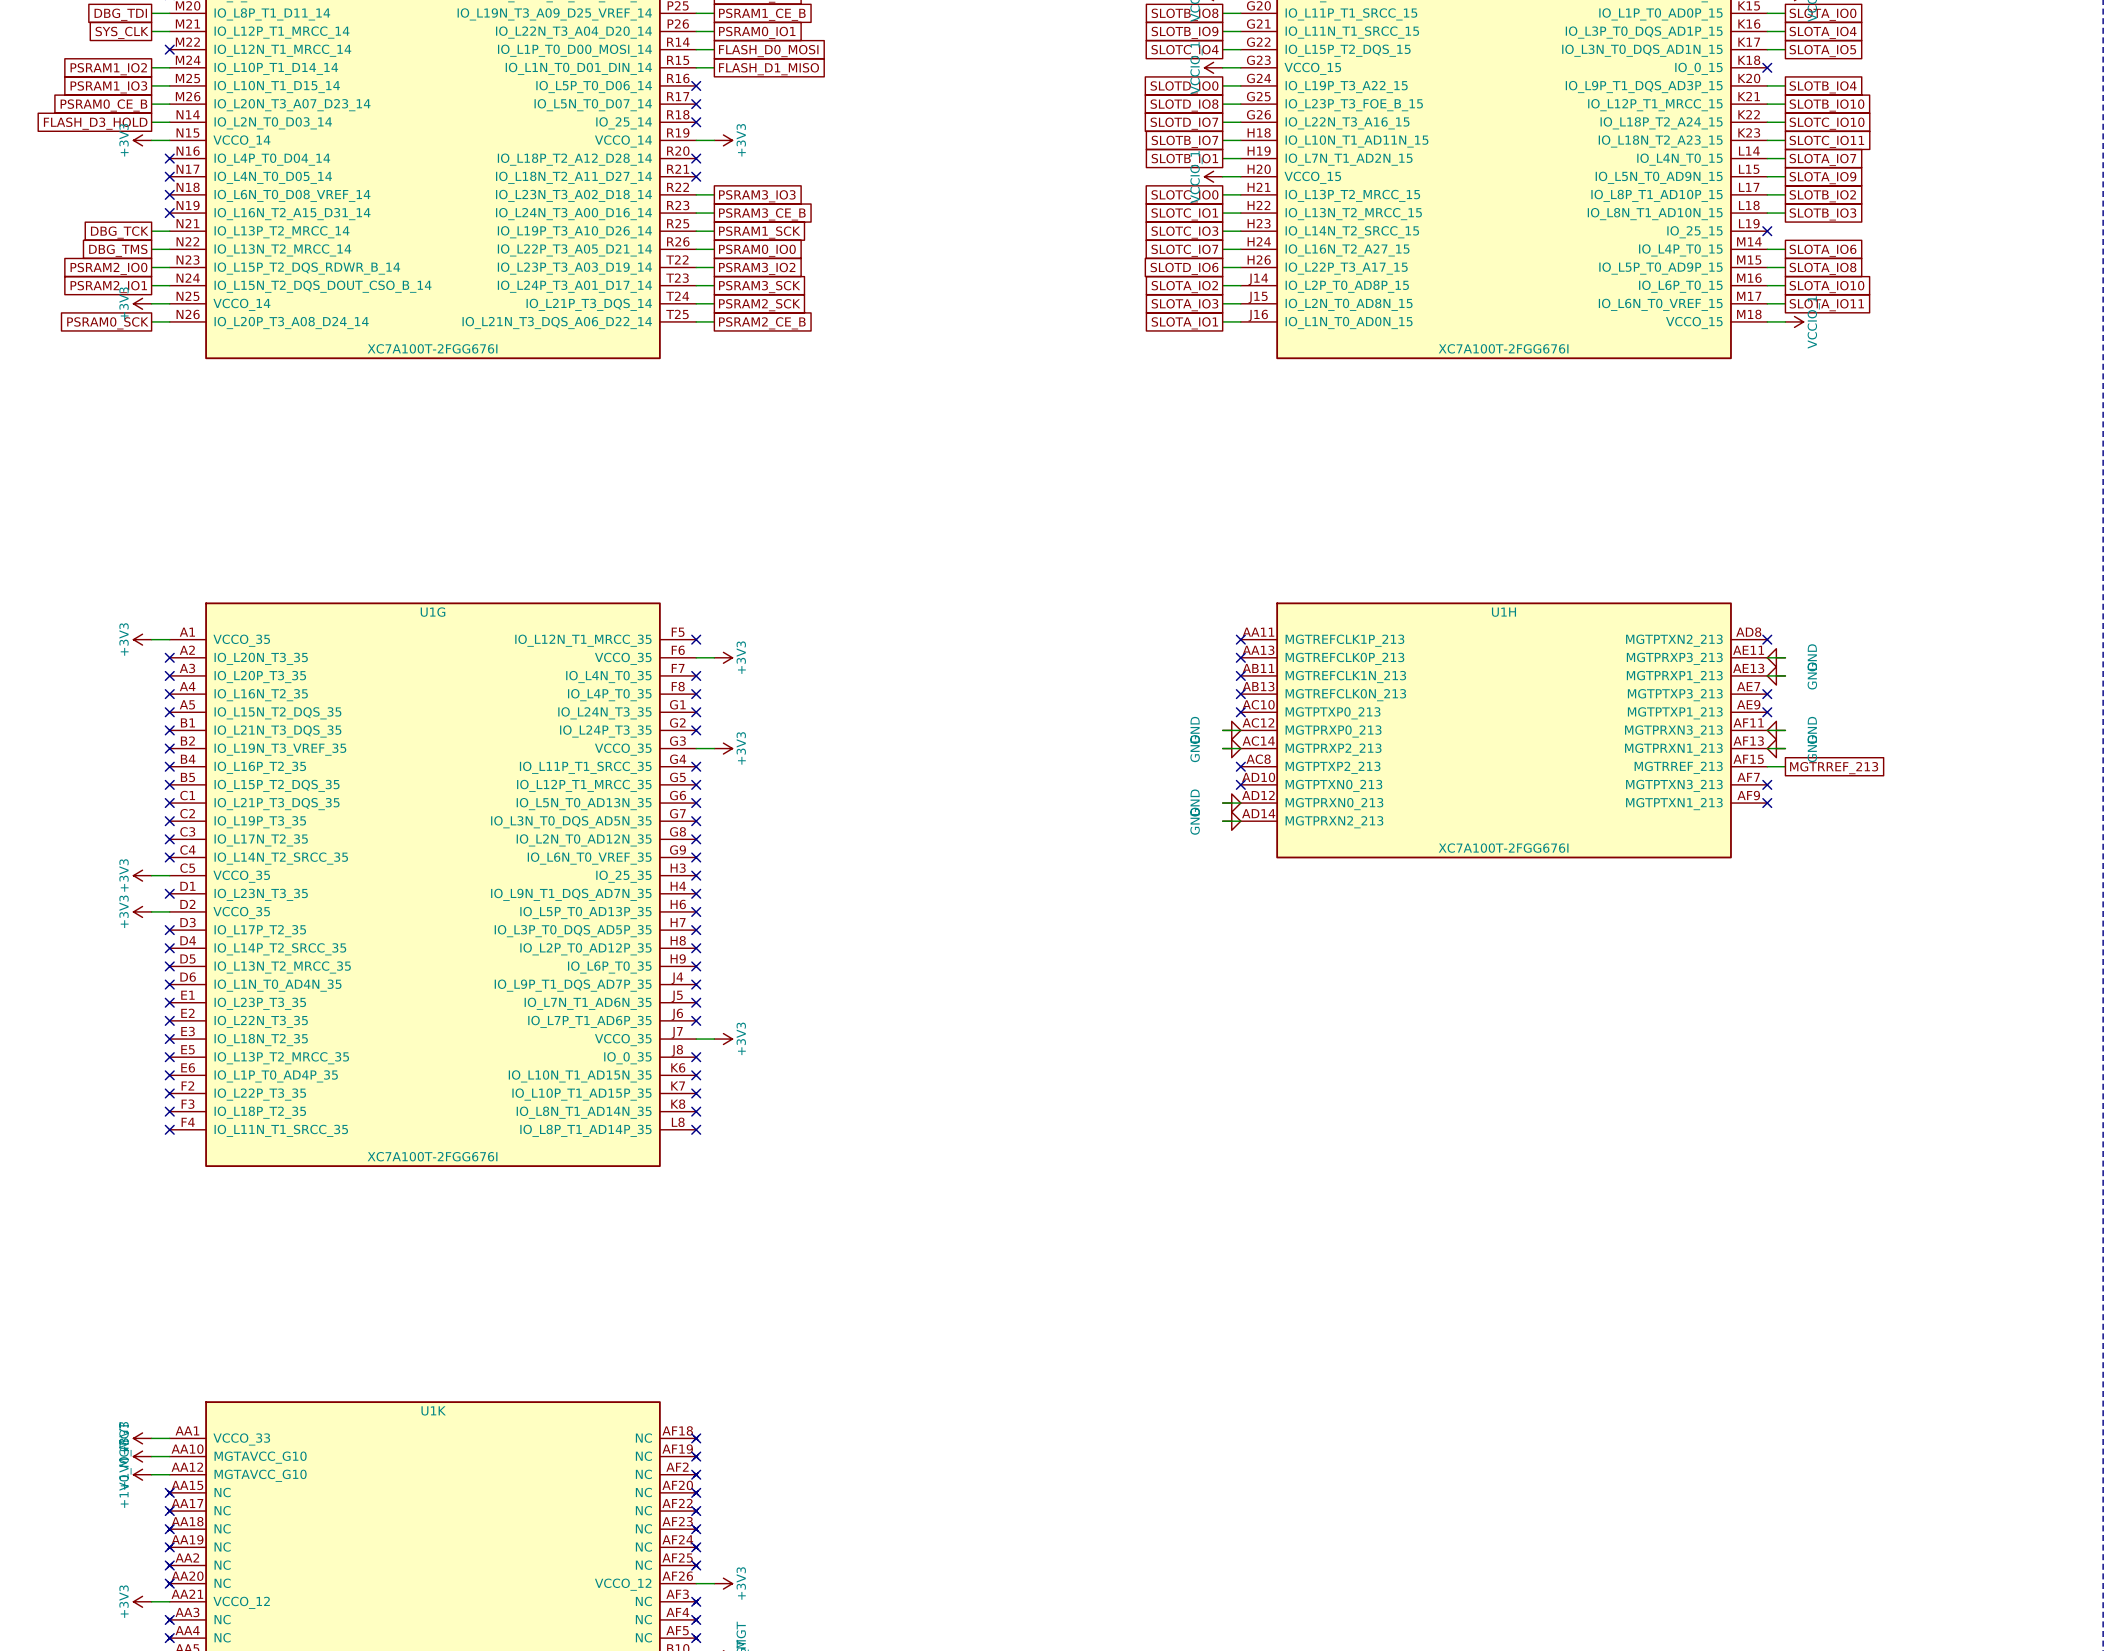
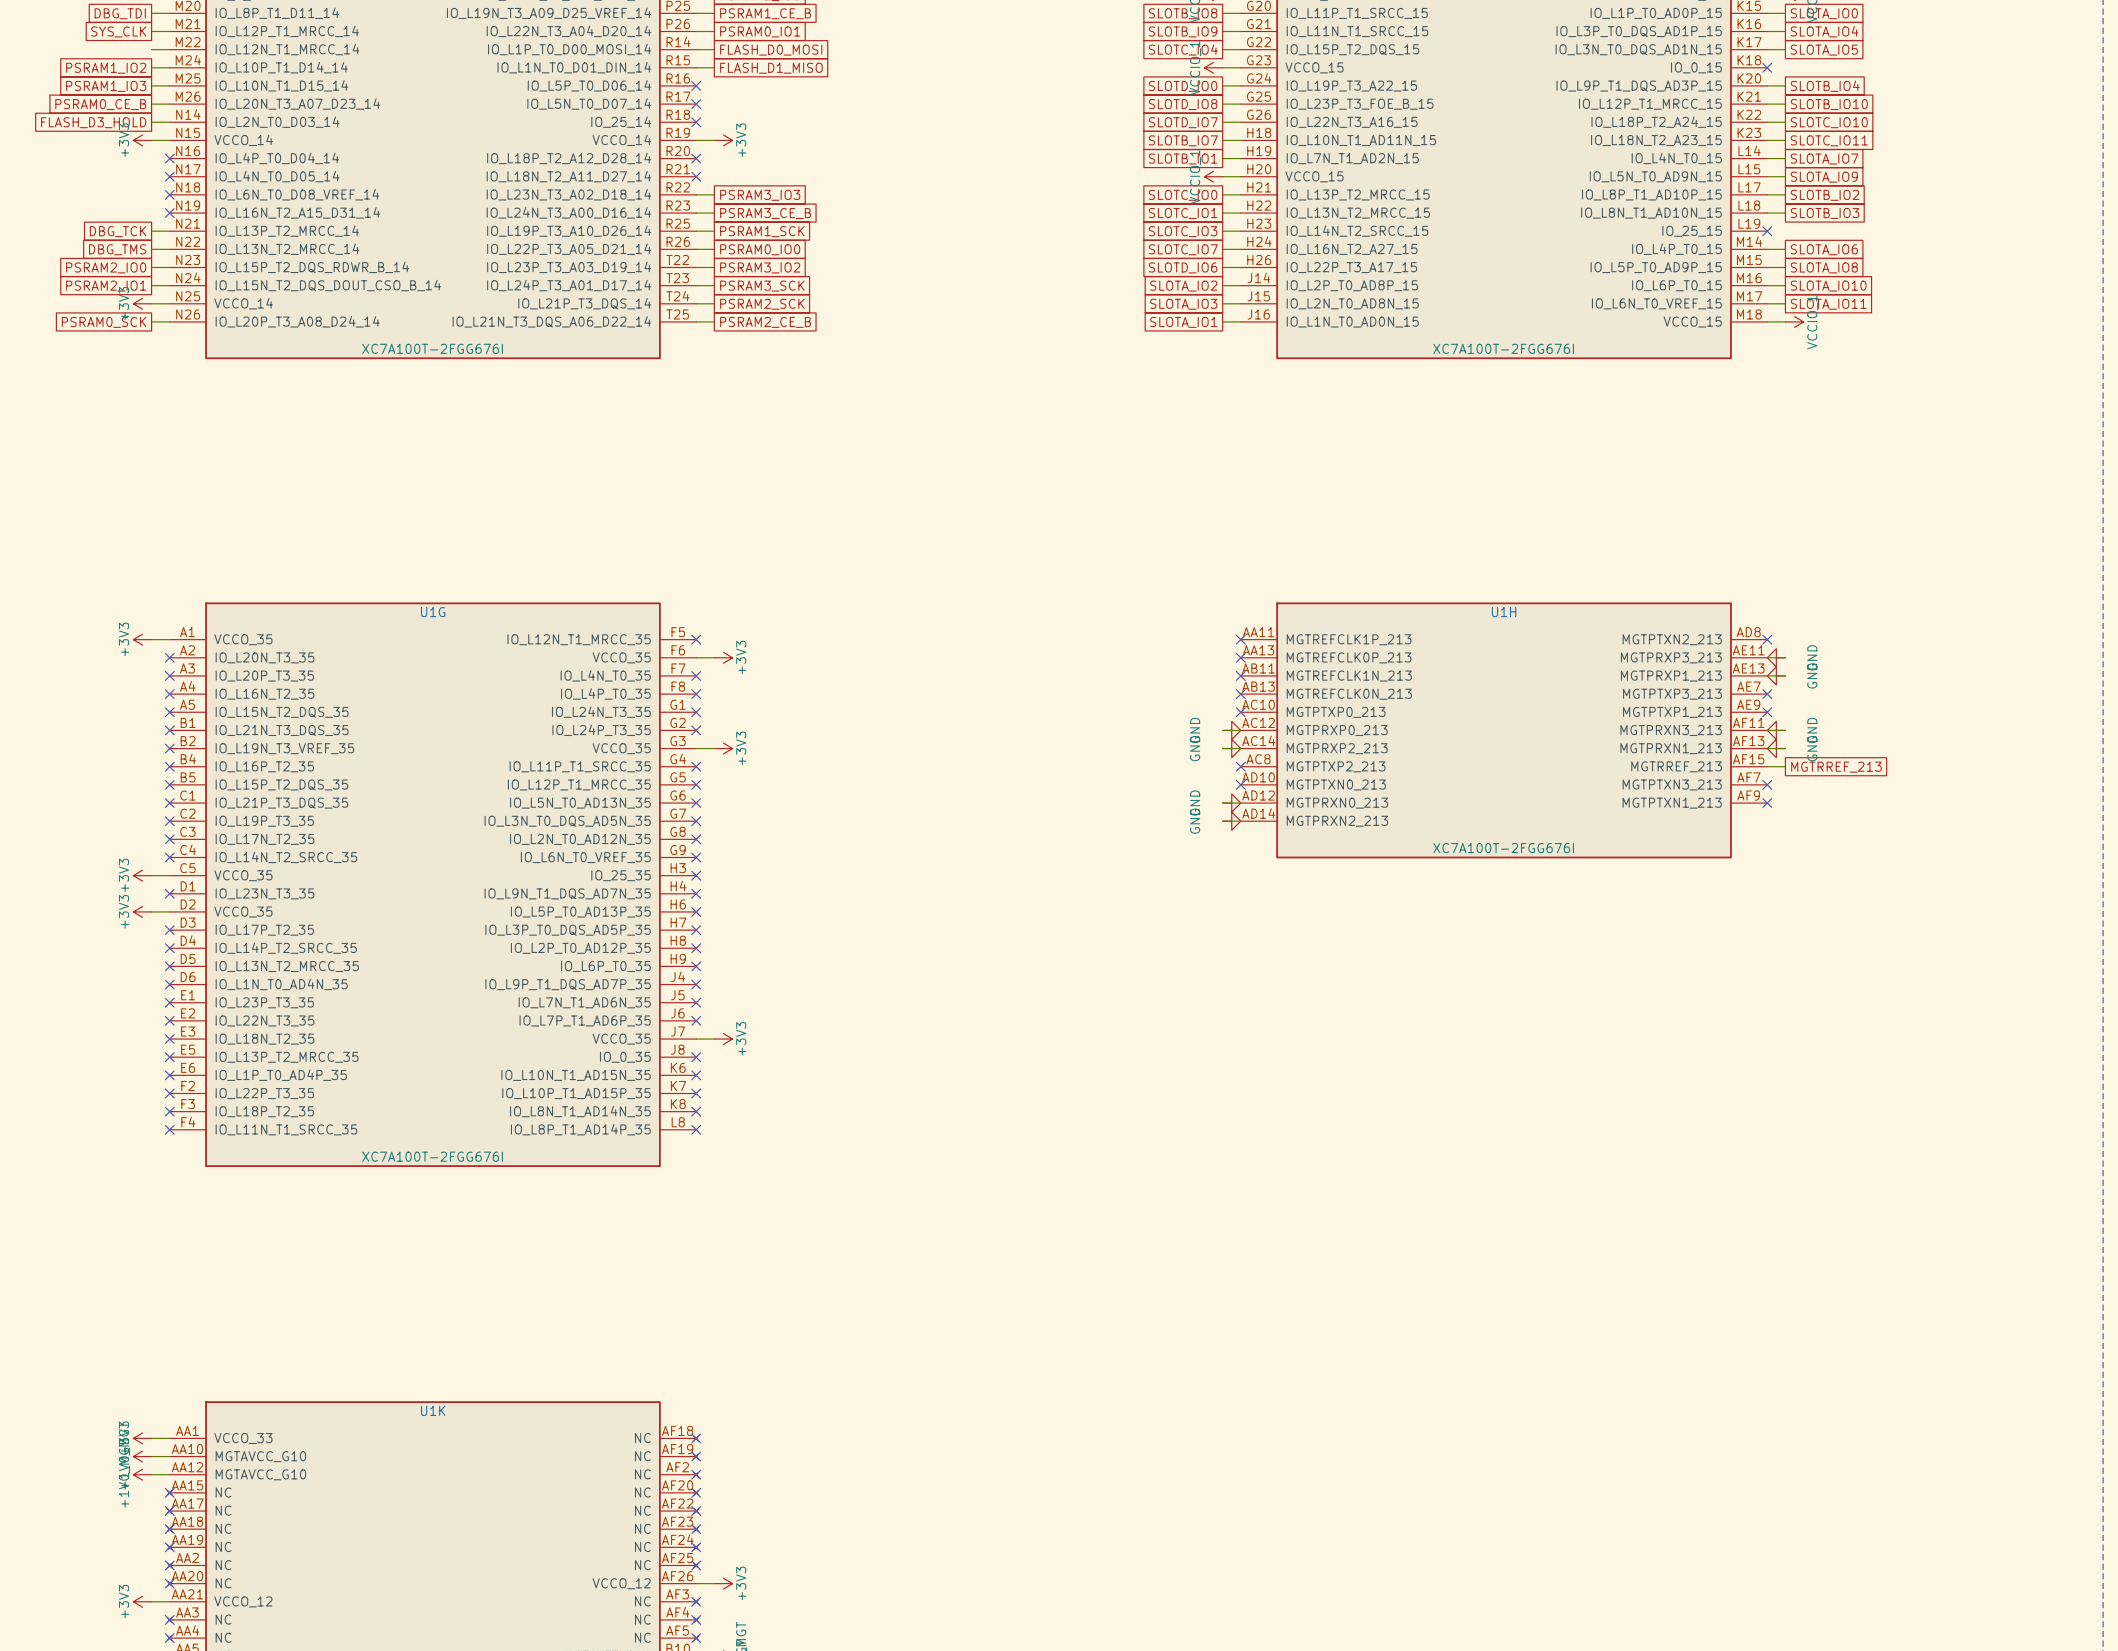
wire: none -> (151, 49) (169, 49)
no-connect mark: (169, 49) -> none

